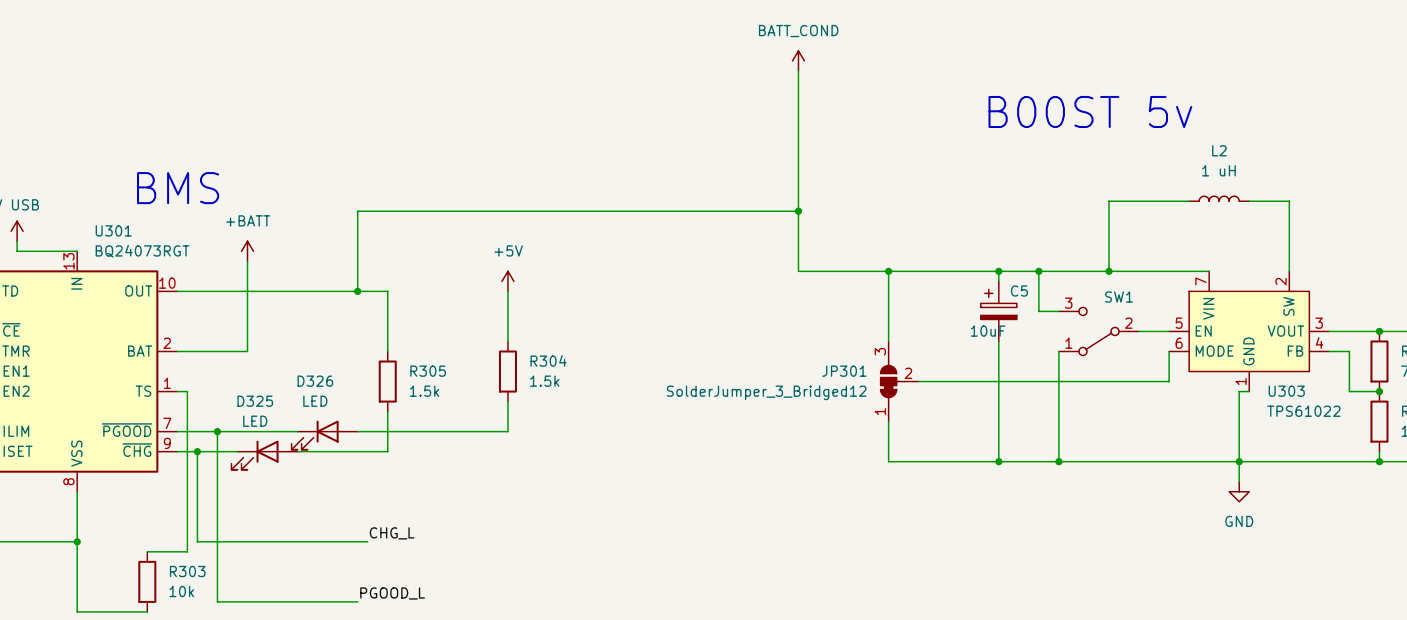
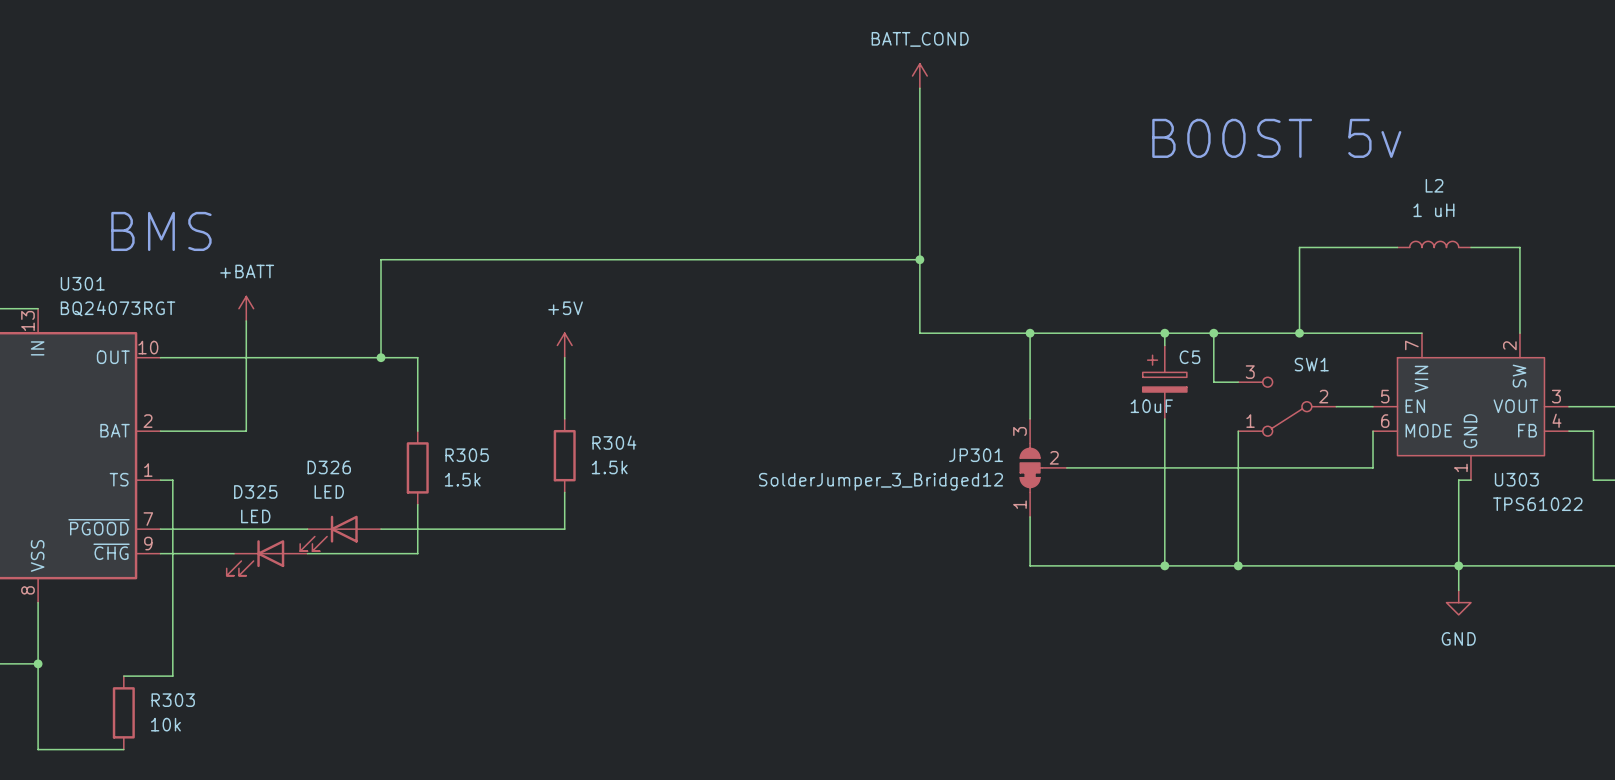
wire: (217, 431) (217, 601) (357, 601) -> none
junction: (217, 431) -> none
wire: (197, 451) (197, 541) (367, 541) -> none
junction: (197, 451) -> none
label: CHG_L (392, 533) -> none
label: PGOOD_L (392, 593) -> none

